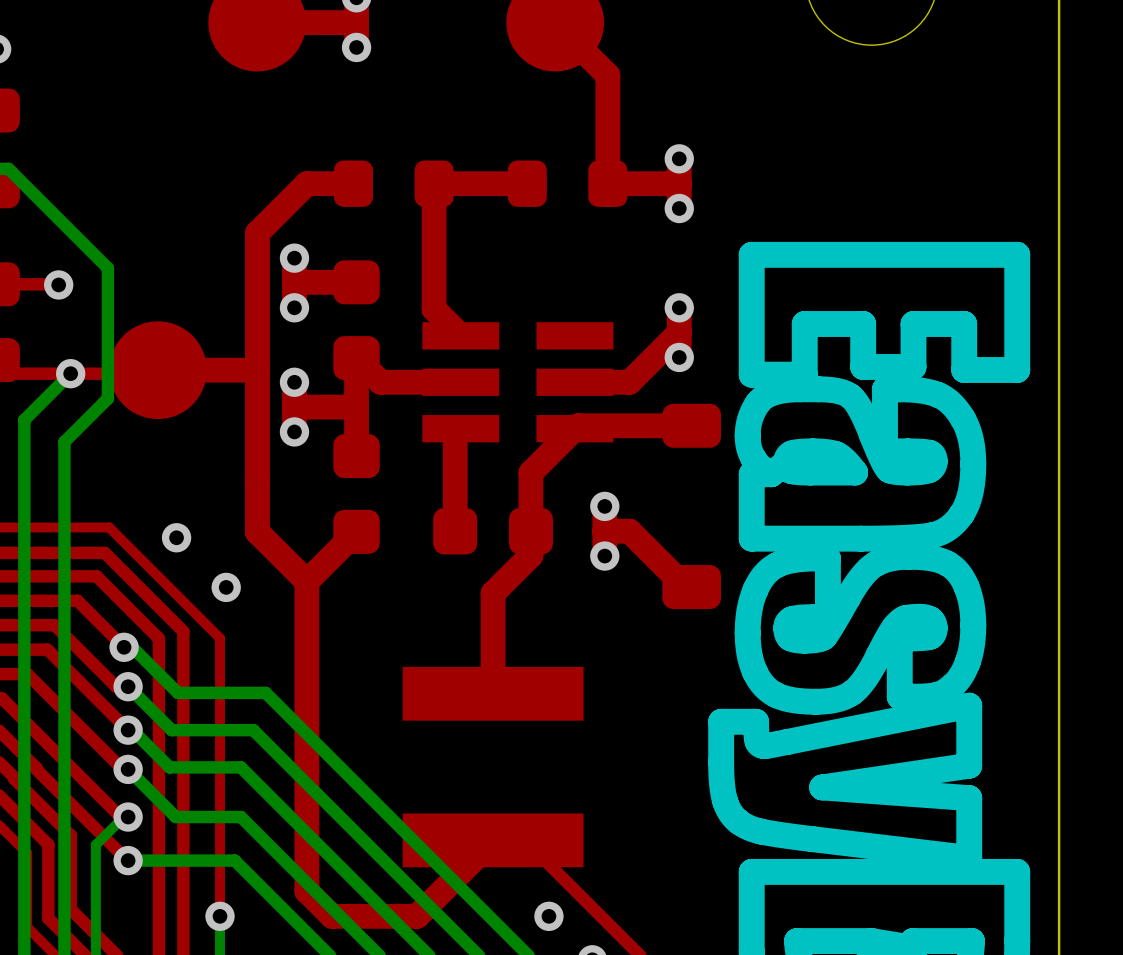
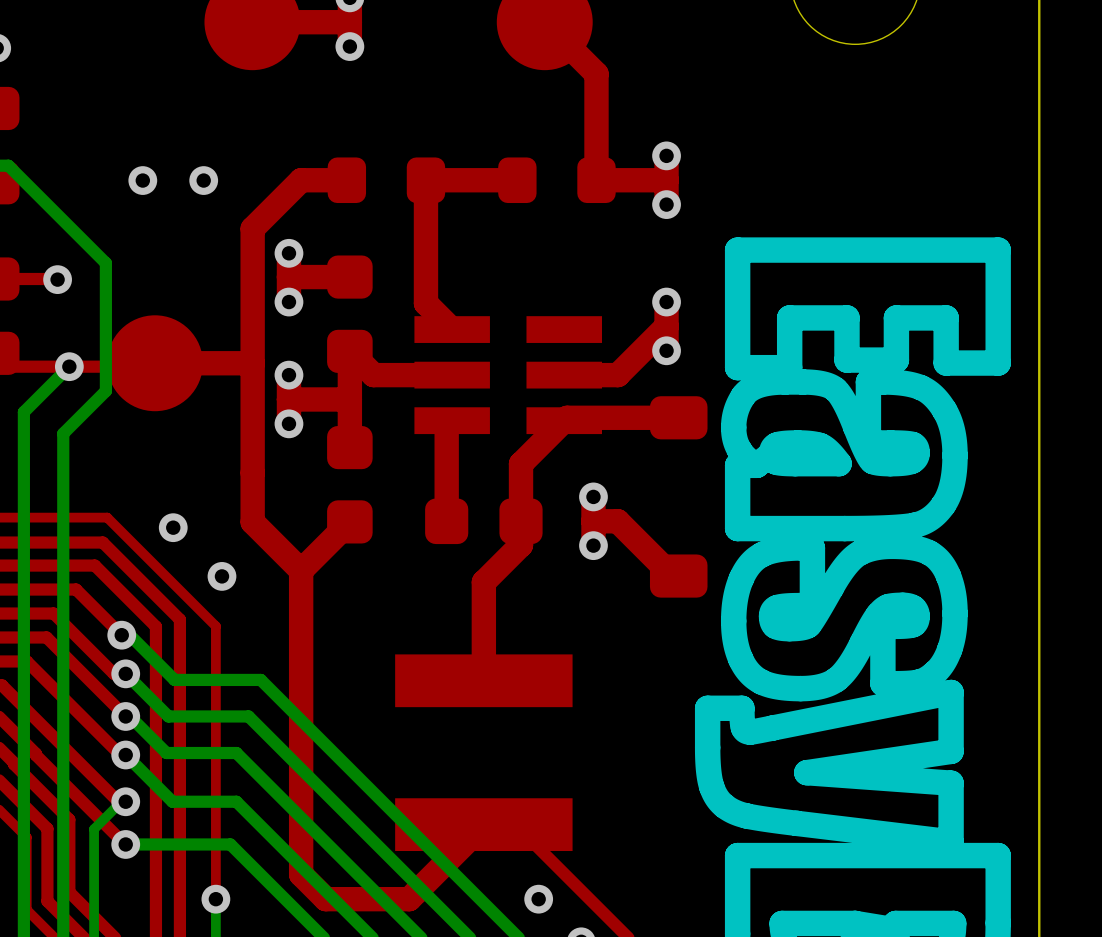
via: none -> (142, 180)
via: none -> (203, 180)

